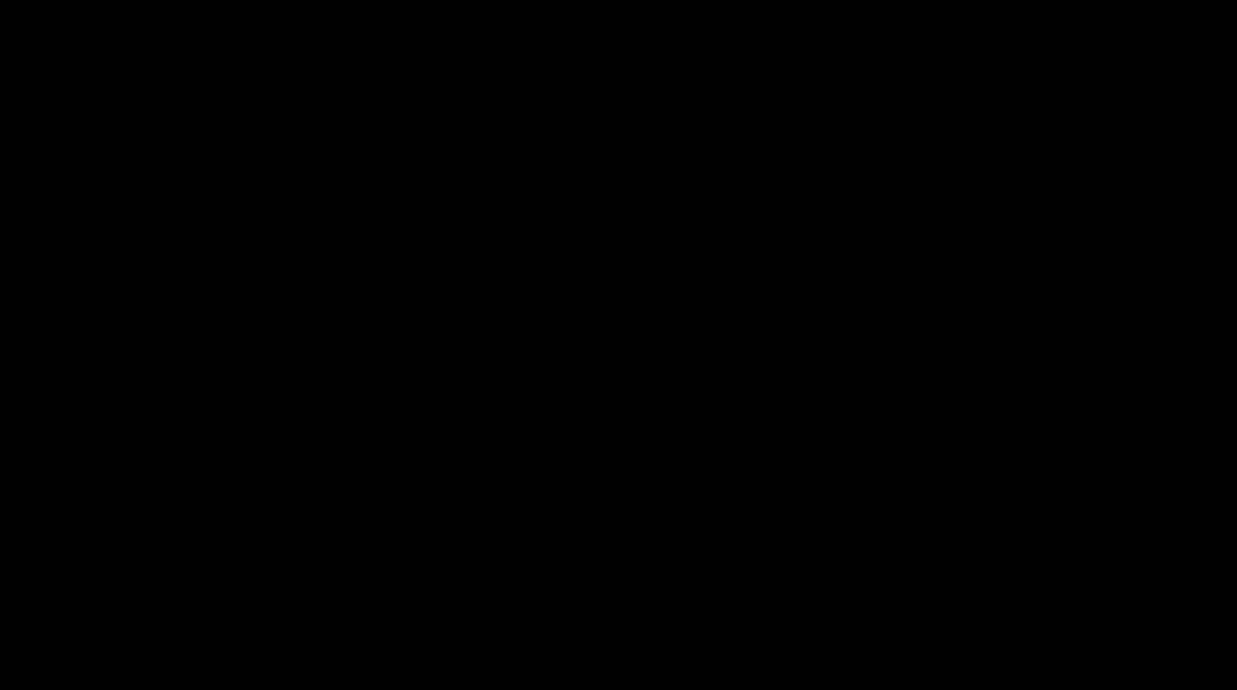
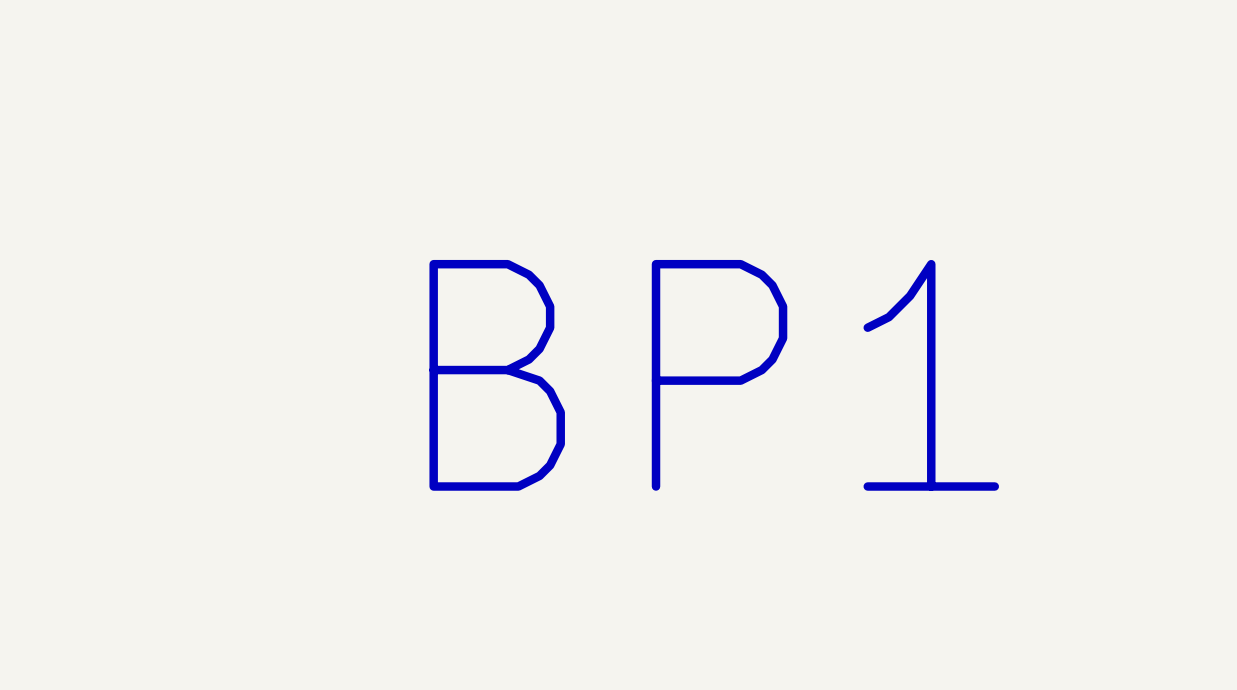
text: none -> BP1 (714, 375)

